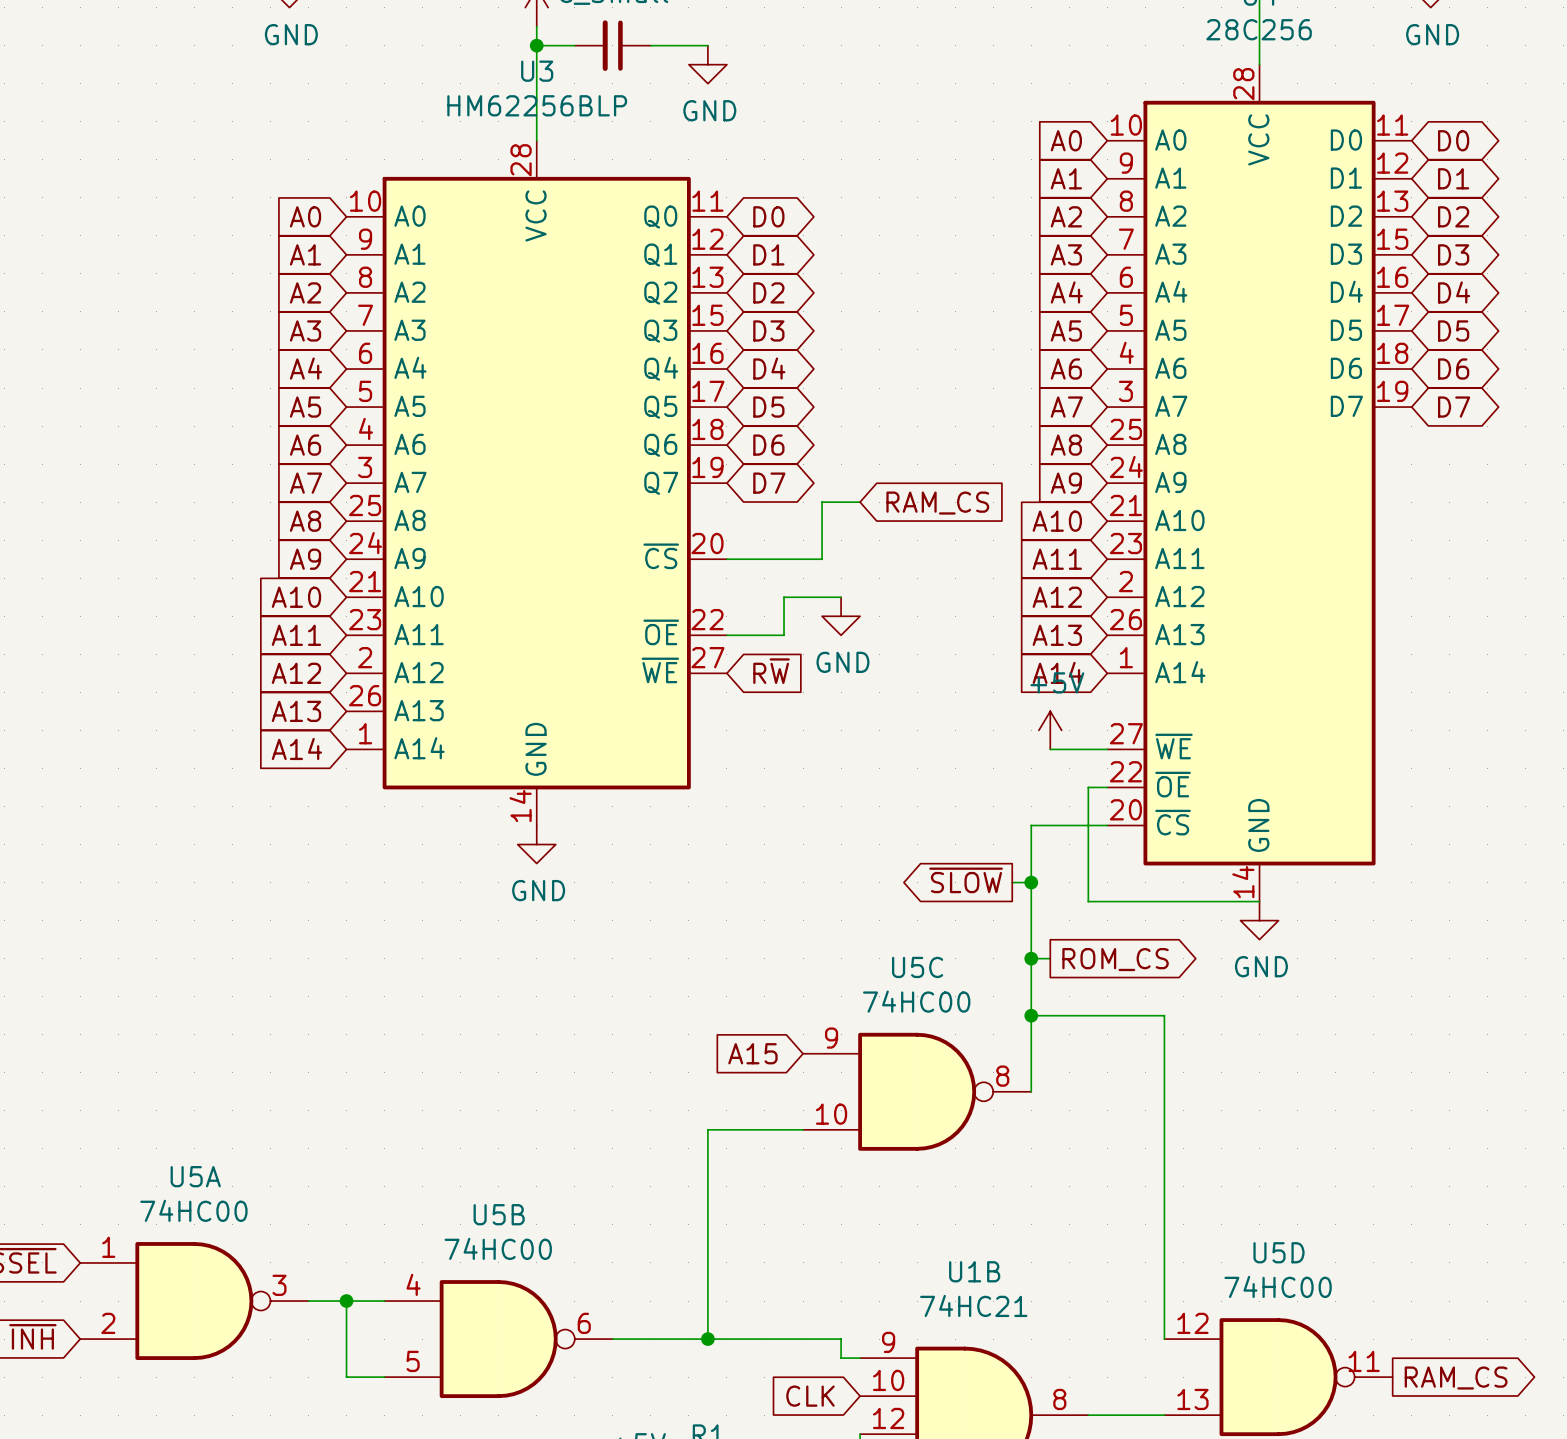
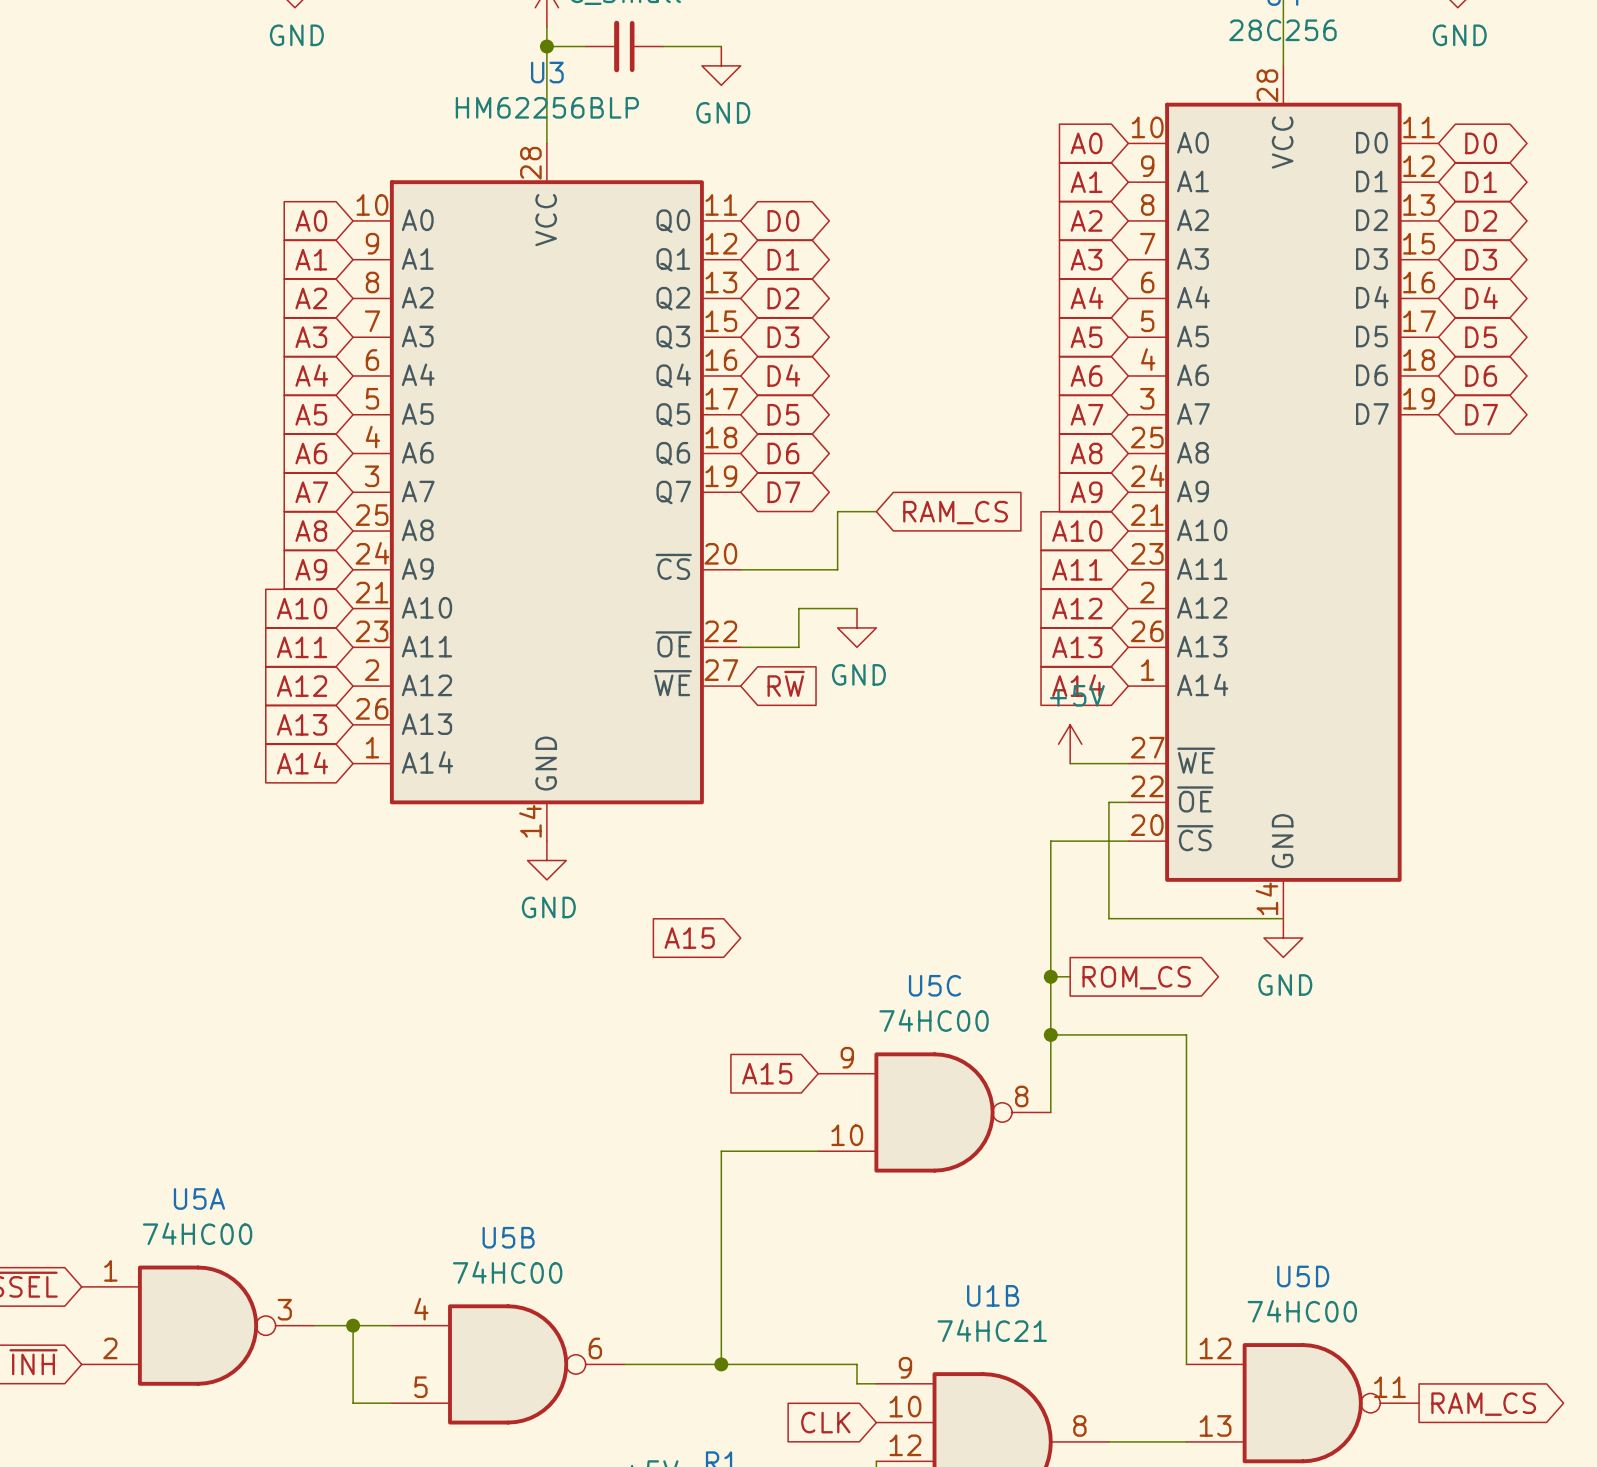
global label: ~{SLOW} (966, 880) -> none
wire: (1012, 882) (1031, 882) -> none
junction: (1031, 882) -> none
global label: none -> A15 (689, 938)

